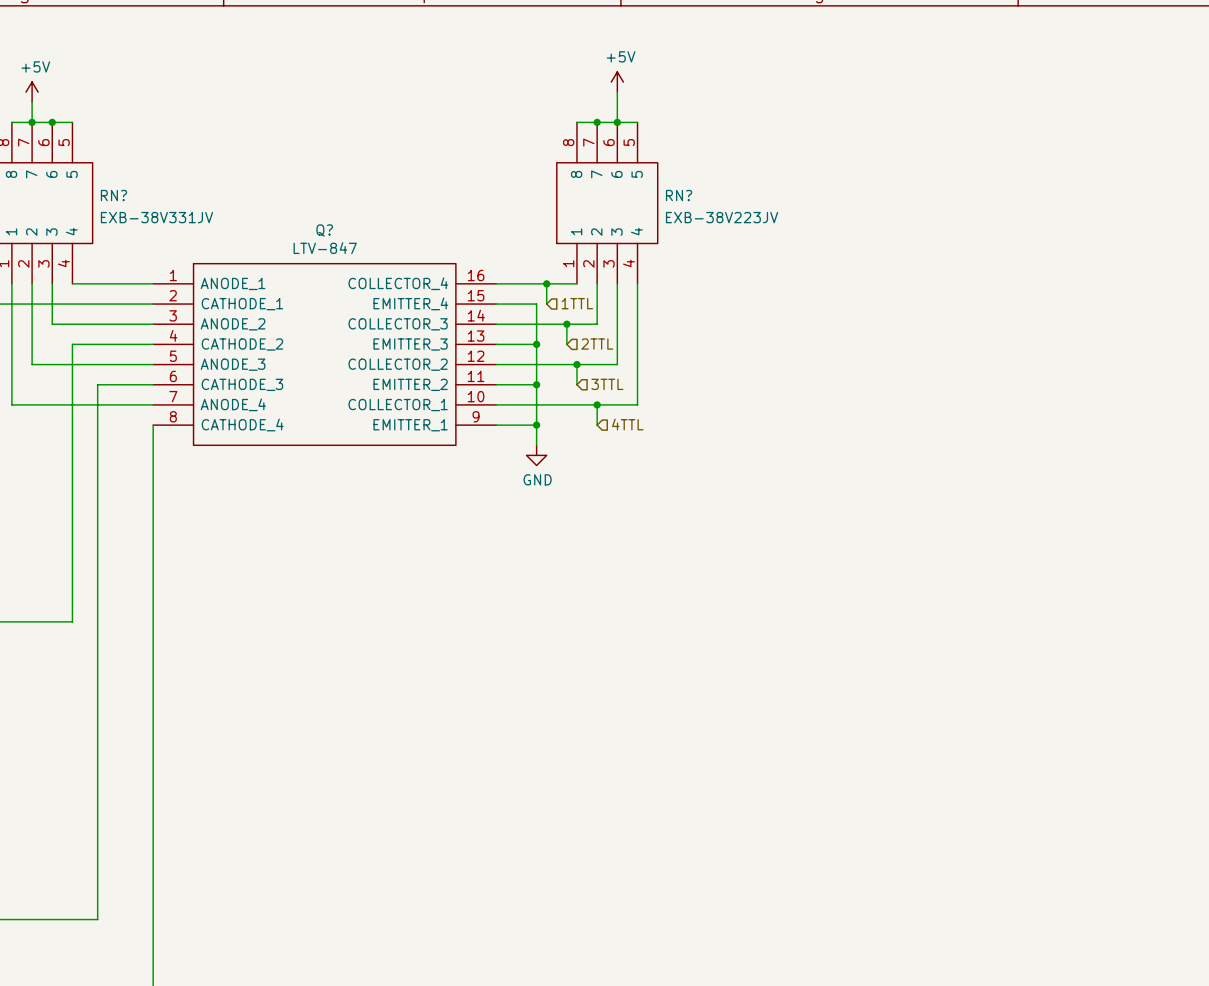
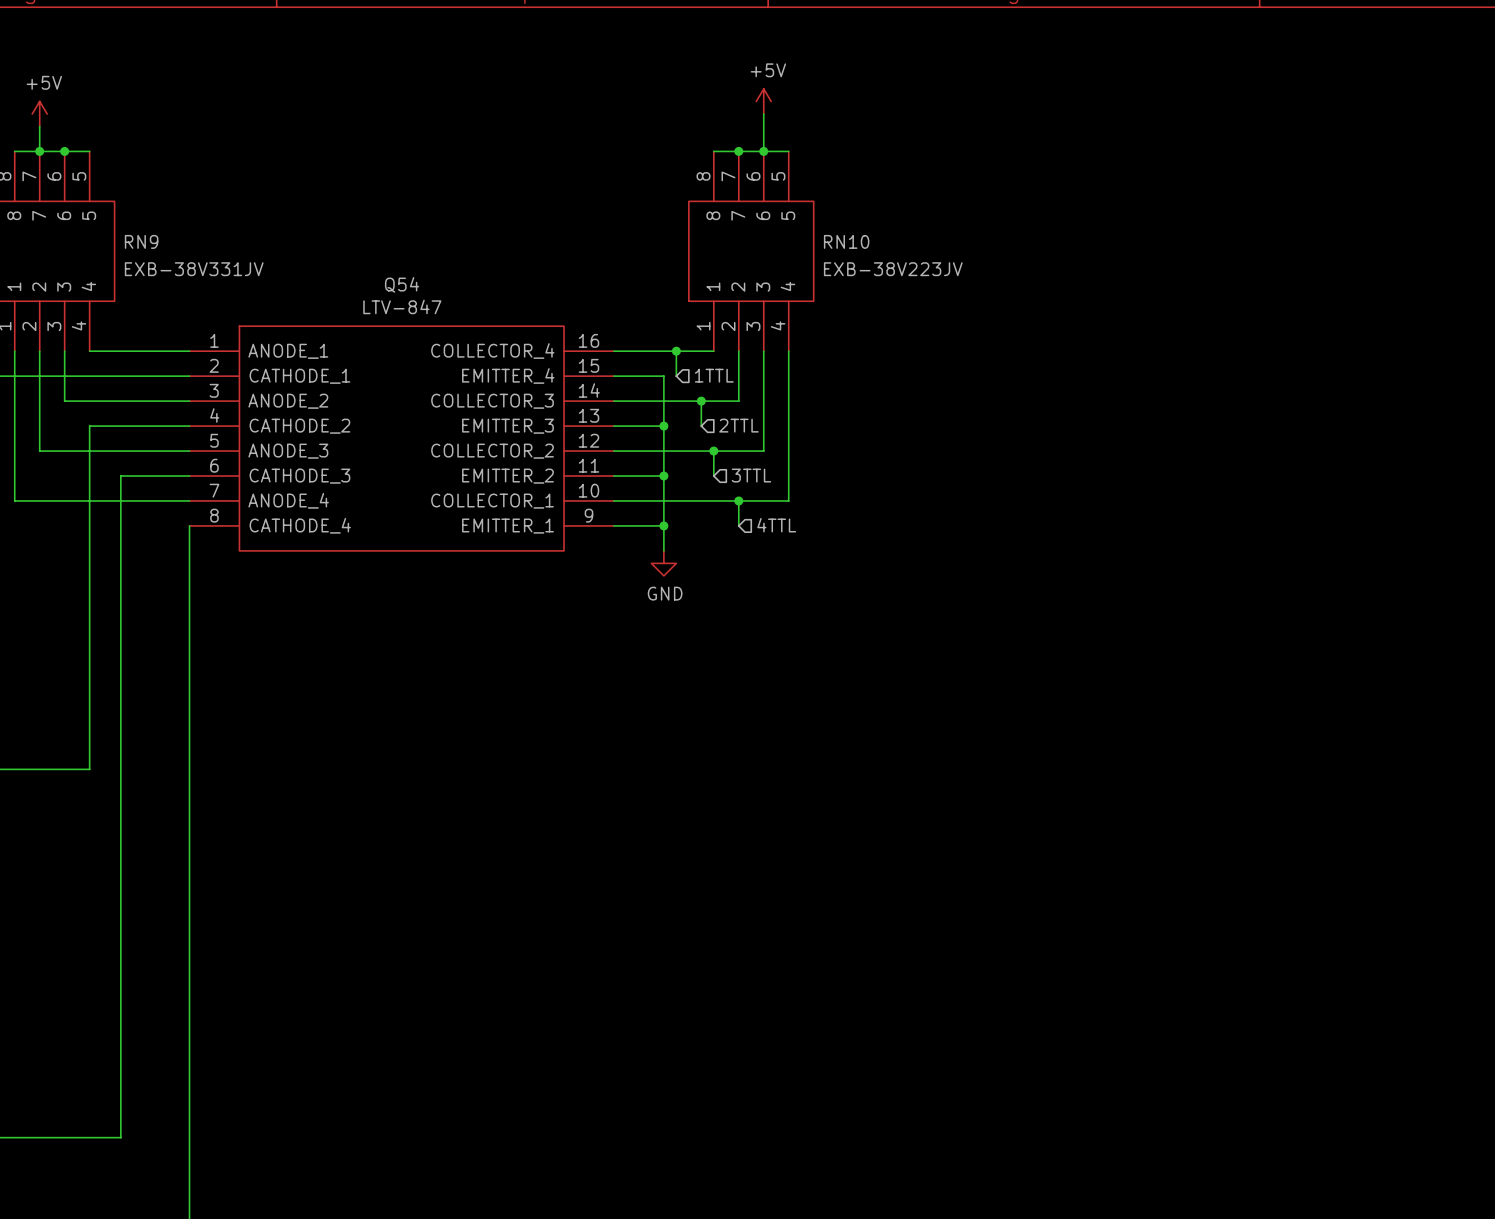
RN? name: RN? (113, 195) -> RN9 (141, 241)
RN? name: RN? (679, 195) -> RN10 (846, 241)
Q? name: Q? (324, 230) -> Q54 (402, 284)

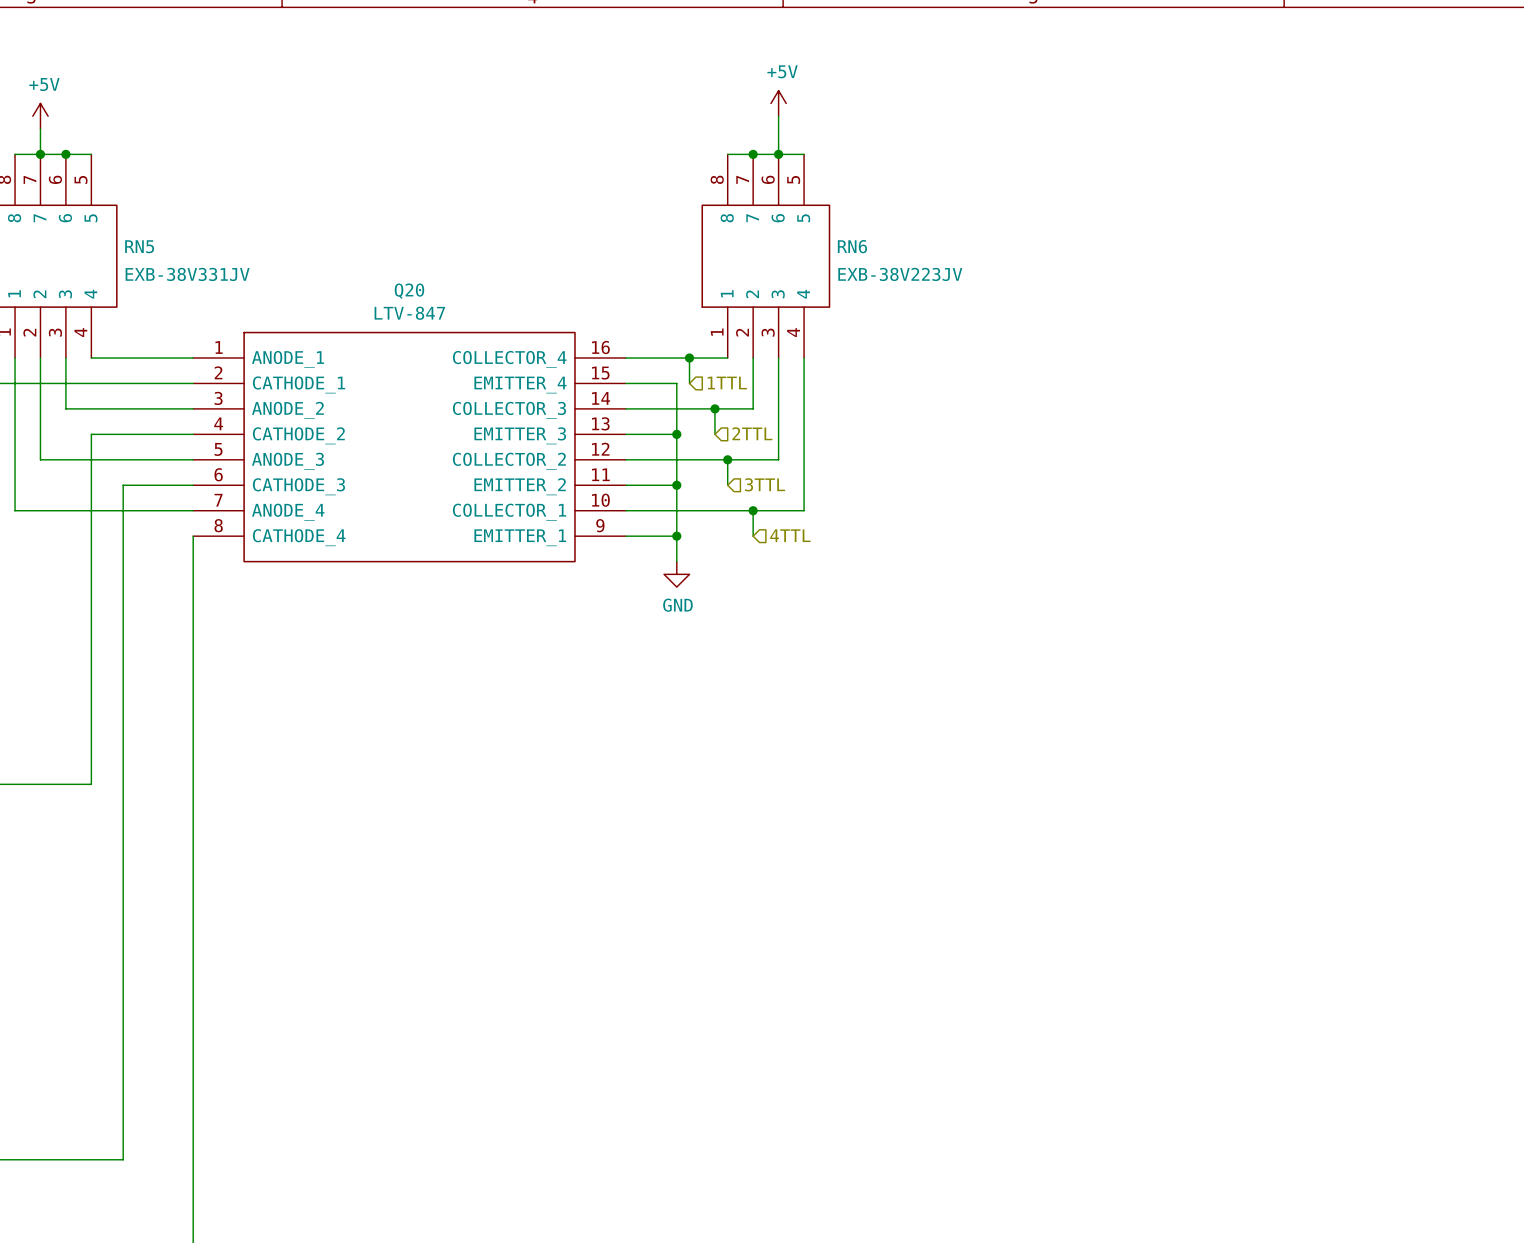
RN9 name: RN9 (141, 241) -> RN5 (139, 246)
RN10 name: RN10 (846, 241) -> RN6 (852, 246)
Q54 name: Q54 (402, 284) -> Q20 (409, 291)

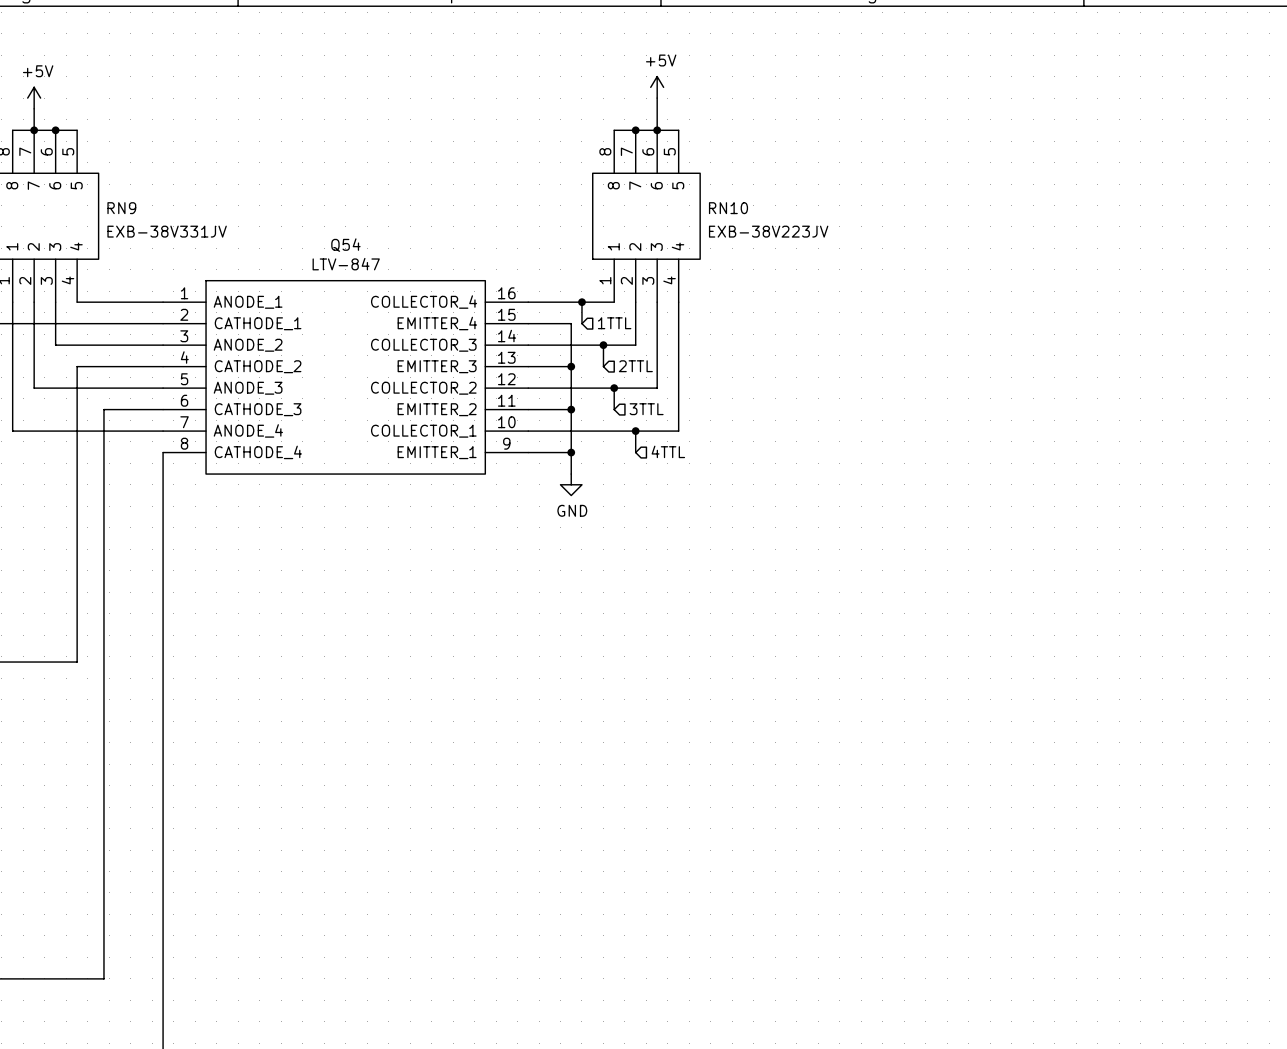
RN5 name: RN5 (139, 246) -> RN9 (121, 208)
RN6 name: RN6 (852, 246) -> RN10 (728, 208)
Q20 name: Q20 (409, 291) -> Q54 (345, 245)

